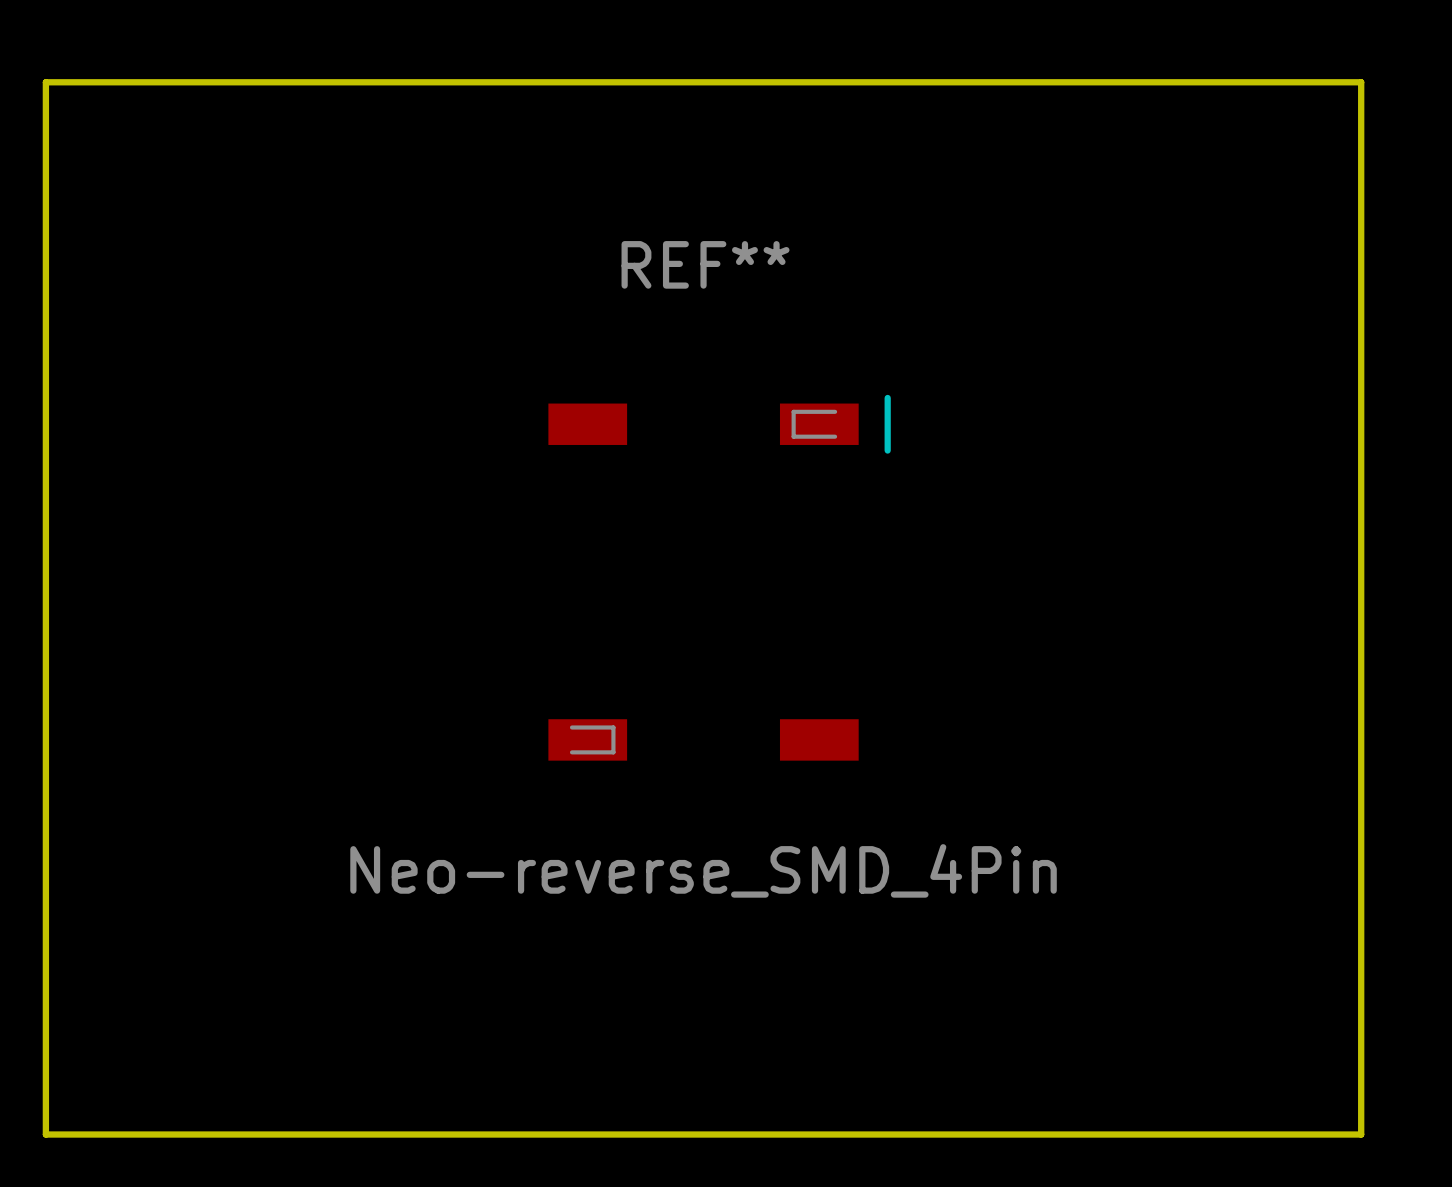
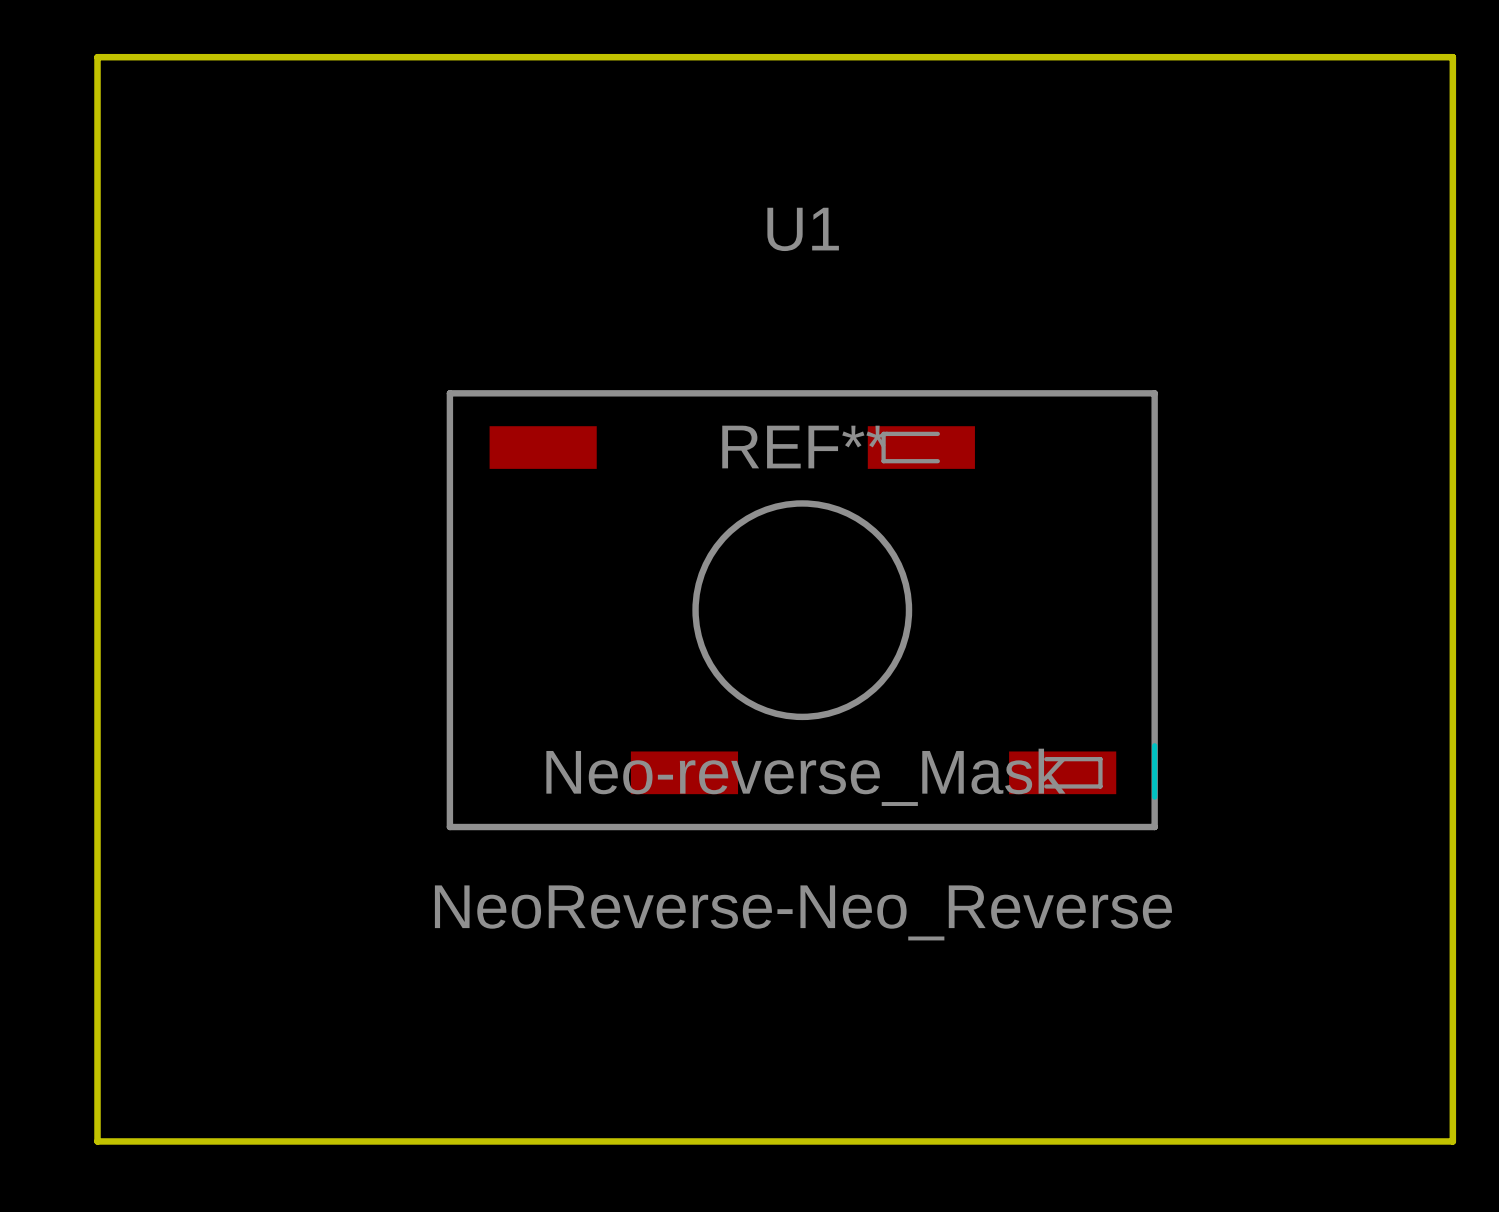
REF**: Neo-reverse_SMD_4Pin (719, 577) -> none
U1: none -> NeoReverse-Neo_Reverse (802, 610)
REF**: none -> Neo-reverse_Mask (805, 615)

